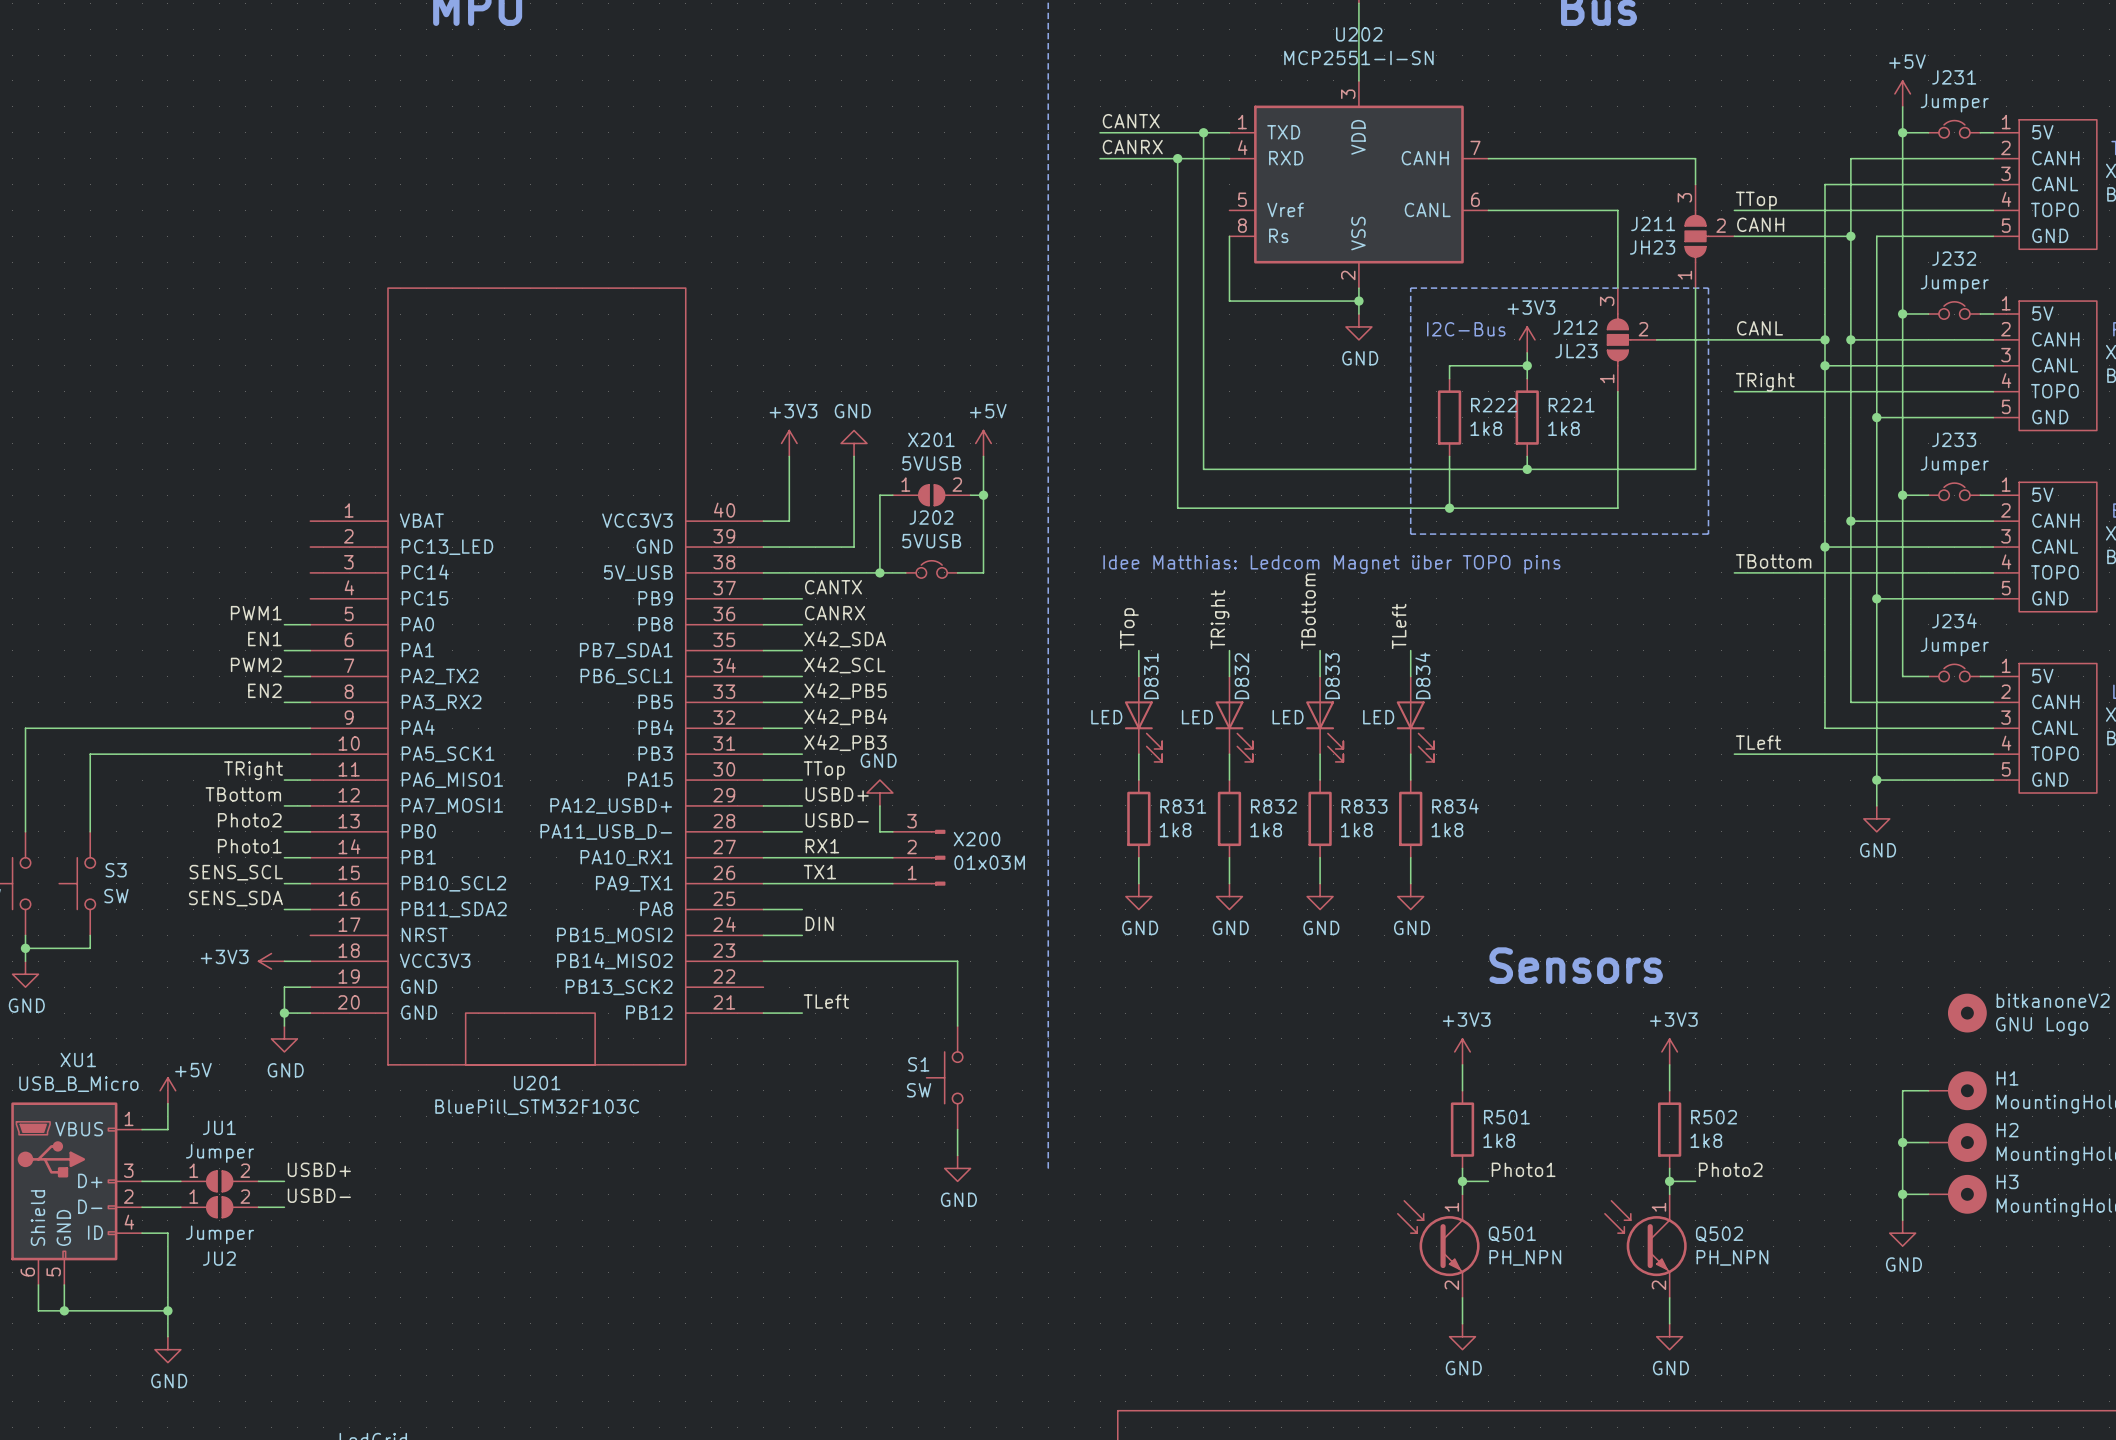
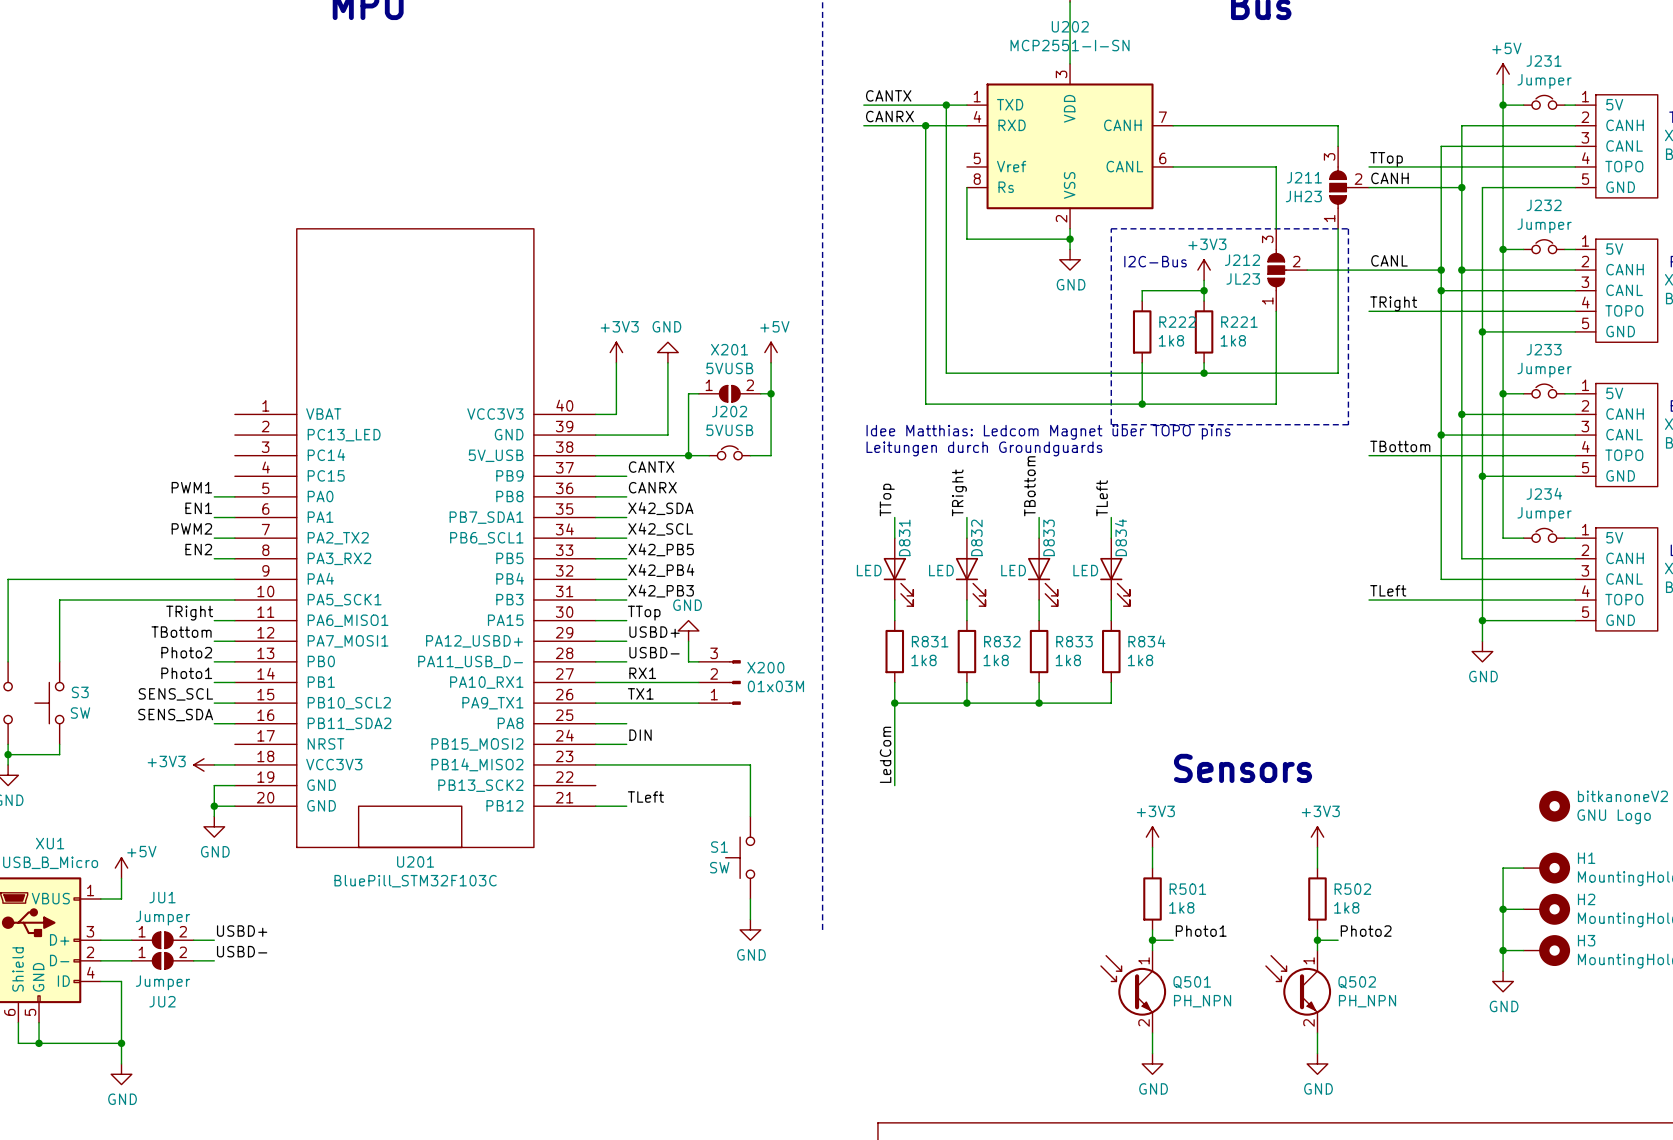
text: none -> Idee Matthias: Ledcom Magnet über TOPO pins (1048, 432)
text: Idee Matthias: Ledcom Magnet über TOPO pins (1331, 564) -> Leitungen durch Groundguards (984, 448)
junction: none -> (894, 703)
junction: none -> (966, 703)
junction: none -> (1039, 703)
wire: none -> (1111, 703) (894, 703) (894, 785)
power symbol: GND (1138, 896) -> none
power symbol: GND (1229, 896) -> none
power symbol: GND (1320, 896) -> none
power symbol: GND (1410, 896) -> none
label: none -> LedCom (885, 754)

